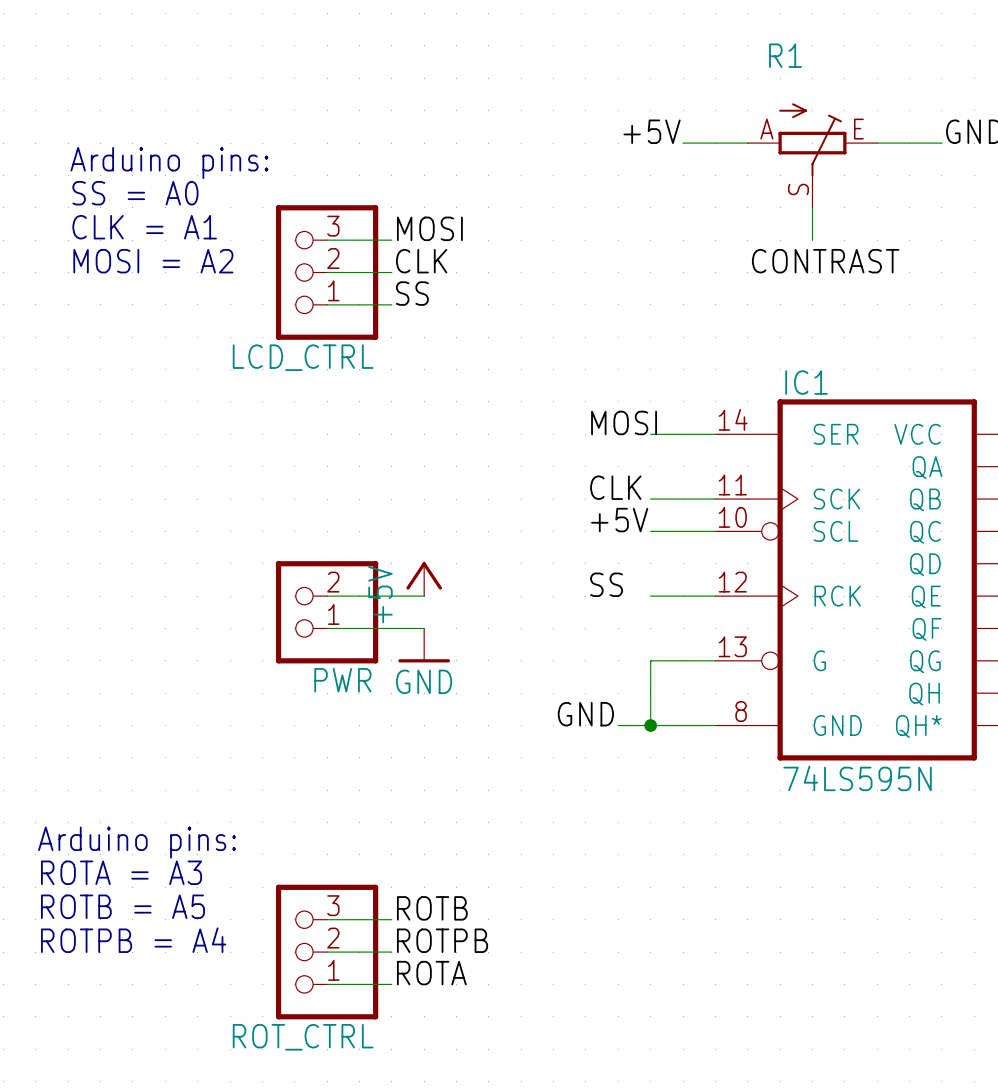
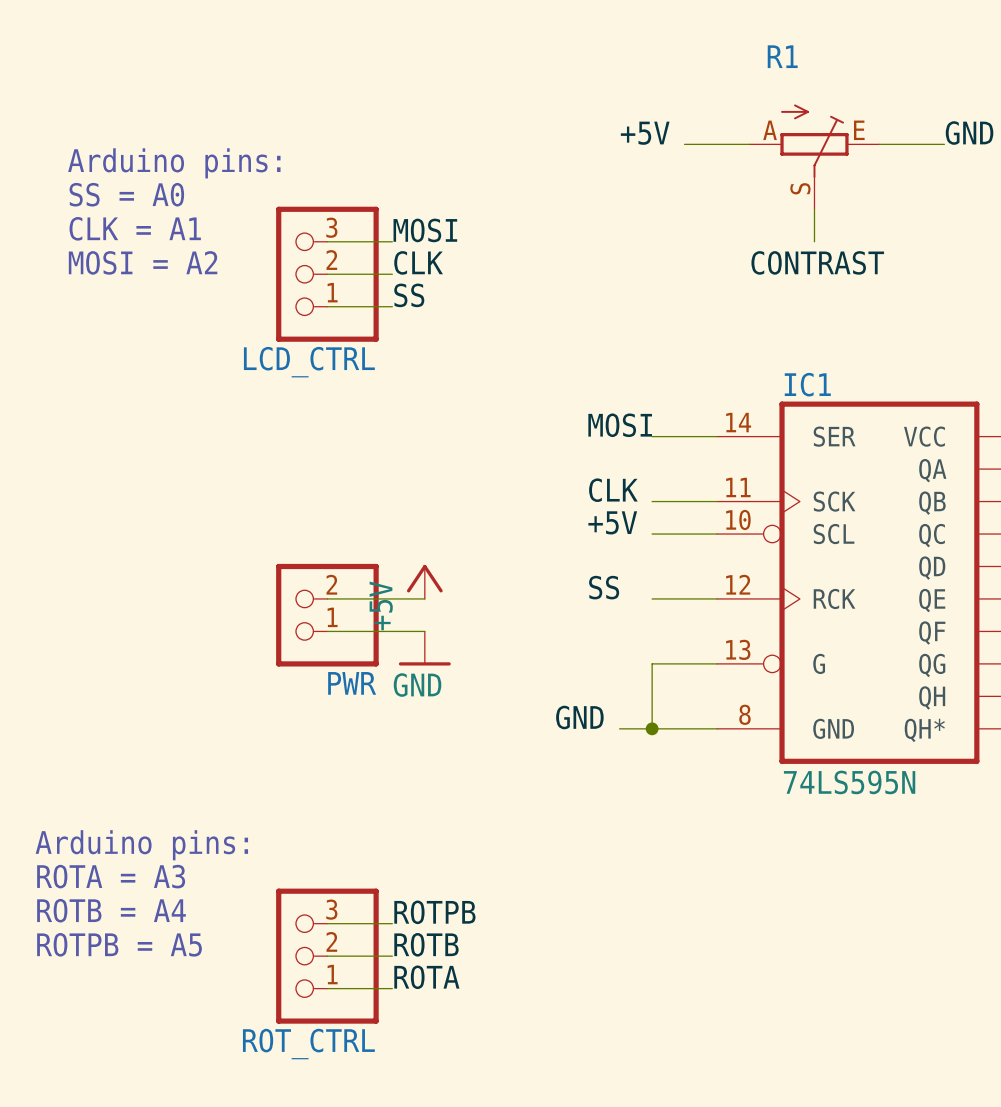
text: ROTB = A5 (122, 906) -> ROTB = A4 (111, 910)
label: ROTB (432, 908) -> ROTPB (434, 912)
text: ROTPB = A4 (133, 940) -> ROTPB = A5 (119, 944)
label: ROTPB (442, 940) -> ROTB (426, 944)

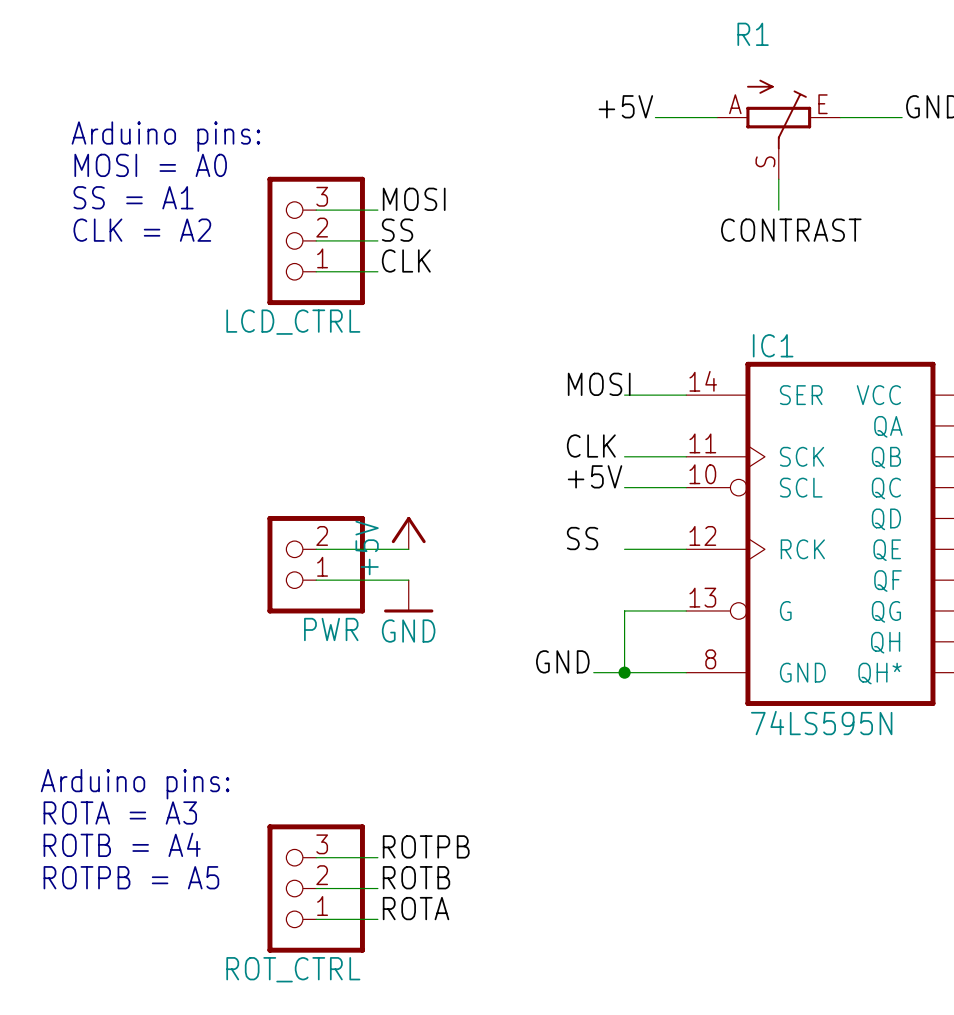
text: SS = A0 (126, 194) -> MOSI = A0 (150, 165)
text: CLK = A1 (135, 228) -> SS = A1 (133, 197)
text: MOSI = A2 (143, 262) -> CLK = A2 (142, 230)
label: CLK (418, 262) -> SS (397, 230)
label: SS (409, 295) -> CLK (406, 260)

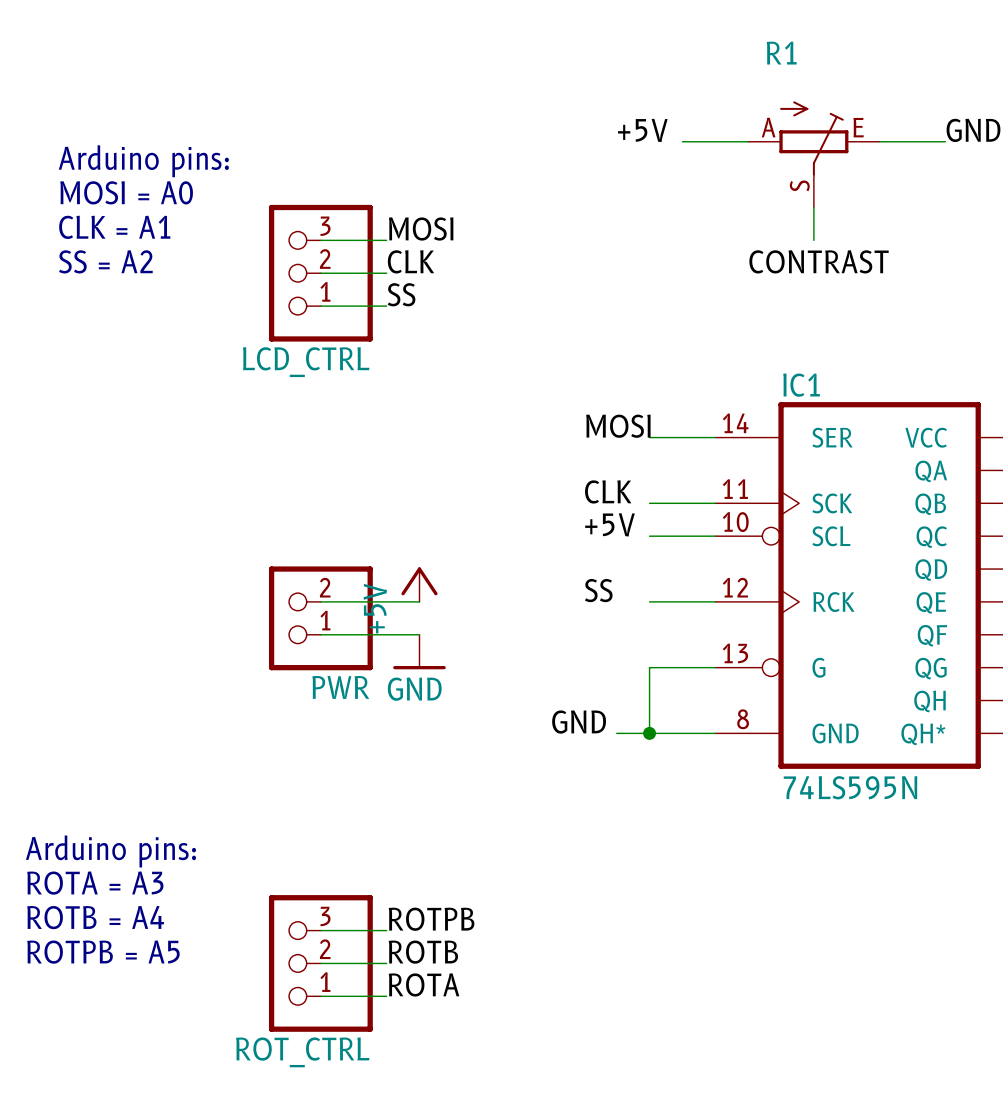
text: SS = A1 (133, 197) -> CLK = A1 (114, 227)
text: CLK = A2 (142, 230) -> SS = A2 (105, 261)
label: SS (397, 230) -> CLK (411, 261)
label: CLK (406, 260) -> SS (401, 294)

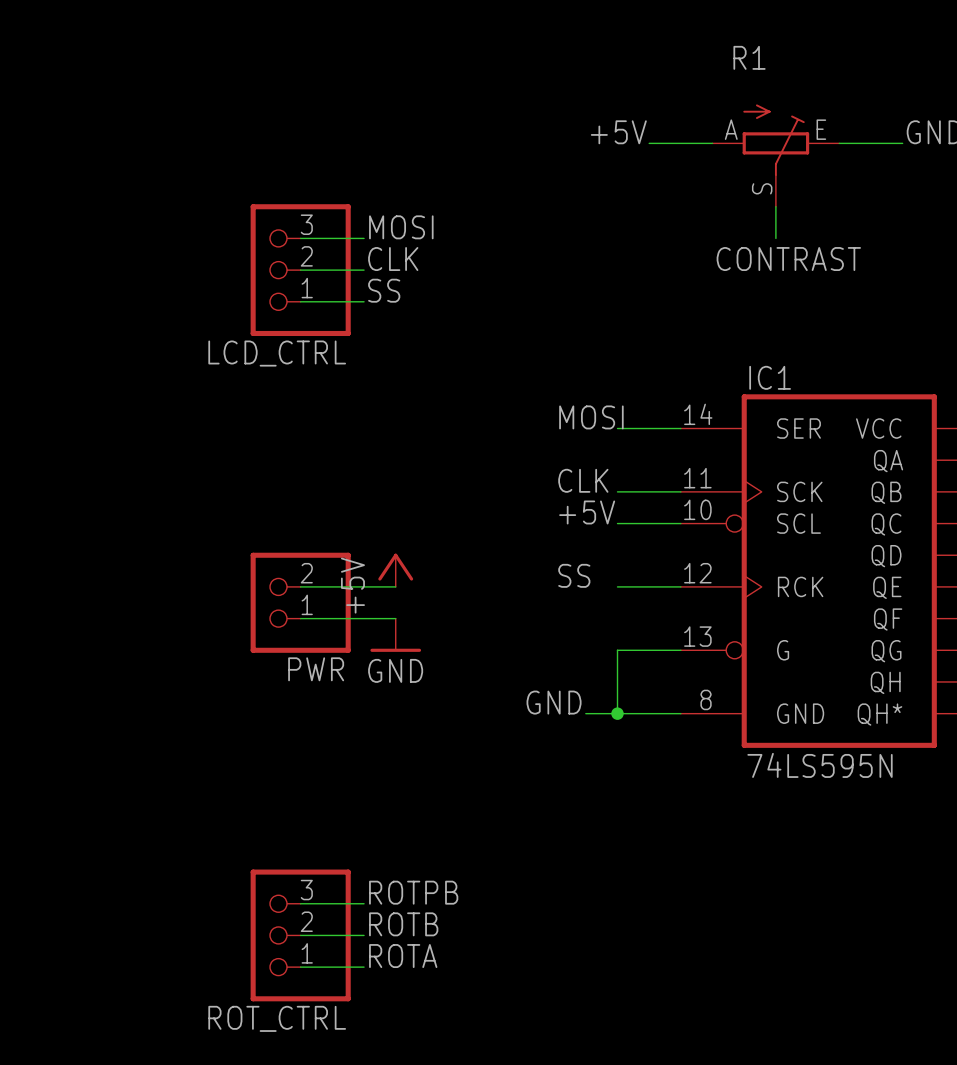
text: Arduino pins: (143, 161) -> none
text: MOSI = A0 (126, 192) -> none
text: CLK = A1 (114, 227) -> none
text: SS = A2 (105, 261) -> none
text: Arduino pins: (110, 851) -> none
text: ROTA = A3 (95, 883) -> none
text: ROTB = A4 (95, 917) -> none
text: ROTPB = A5 (103, 952) -> none

